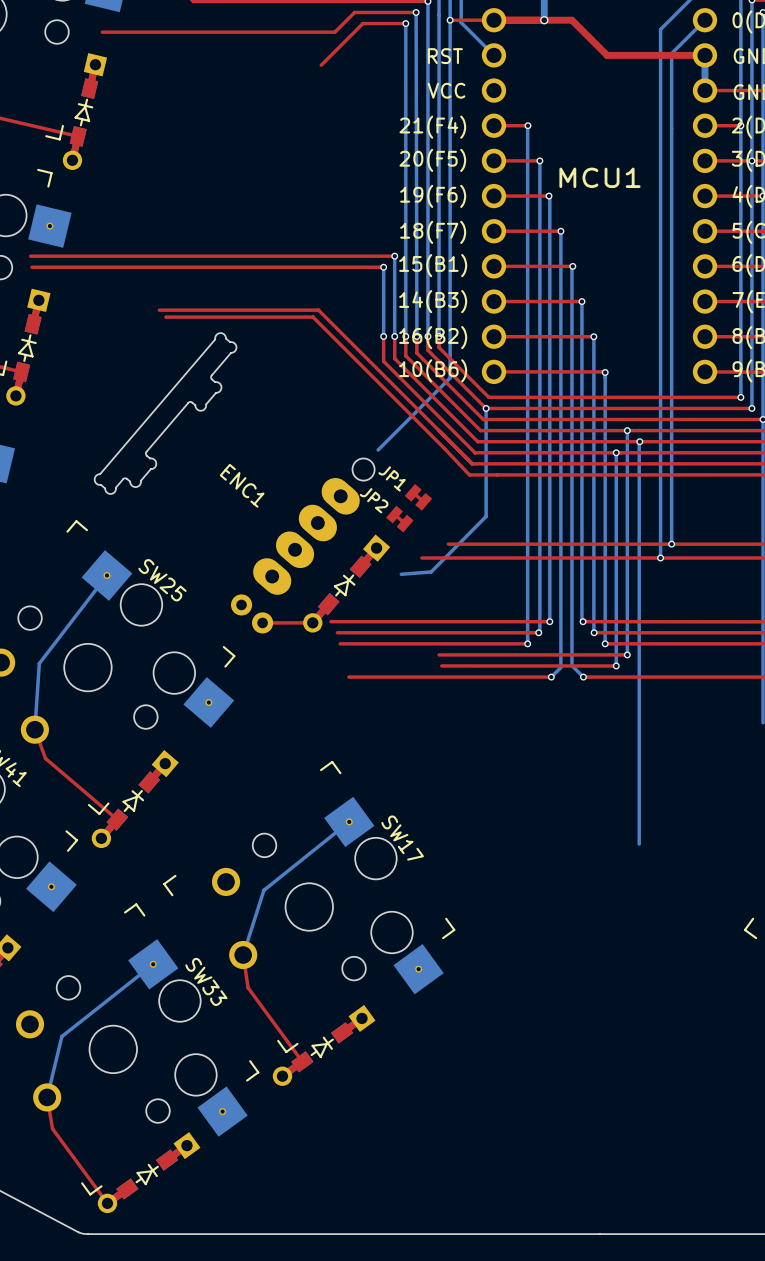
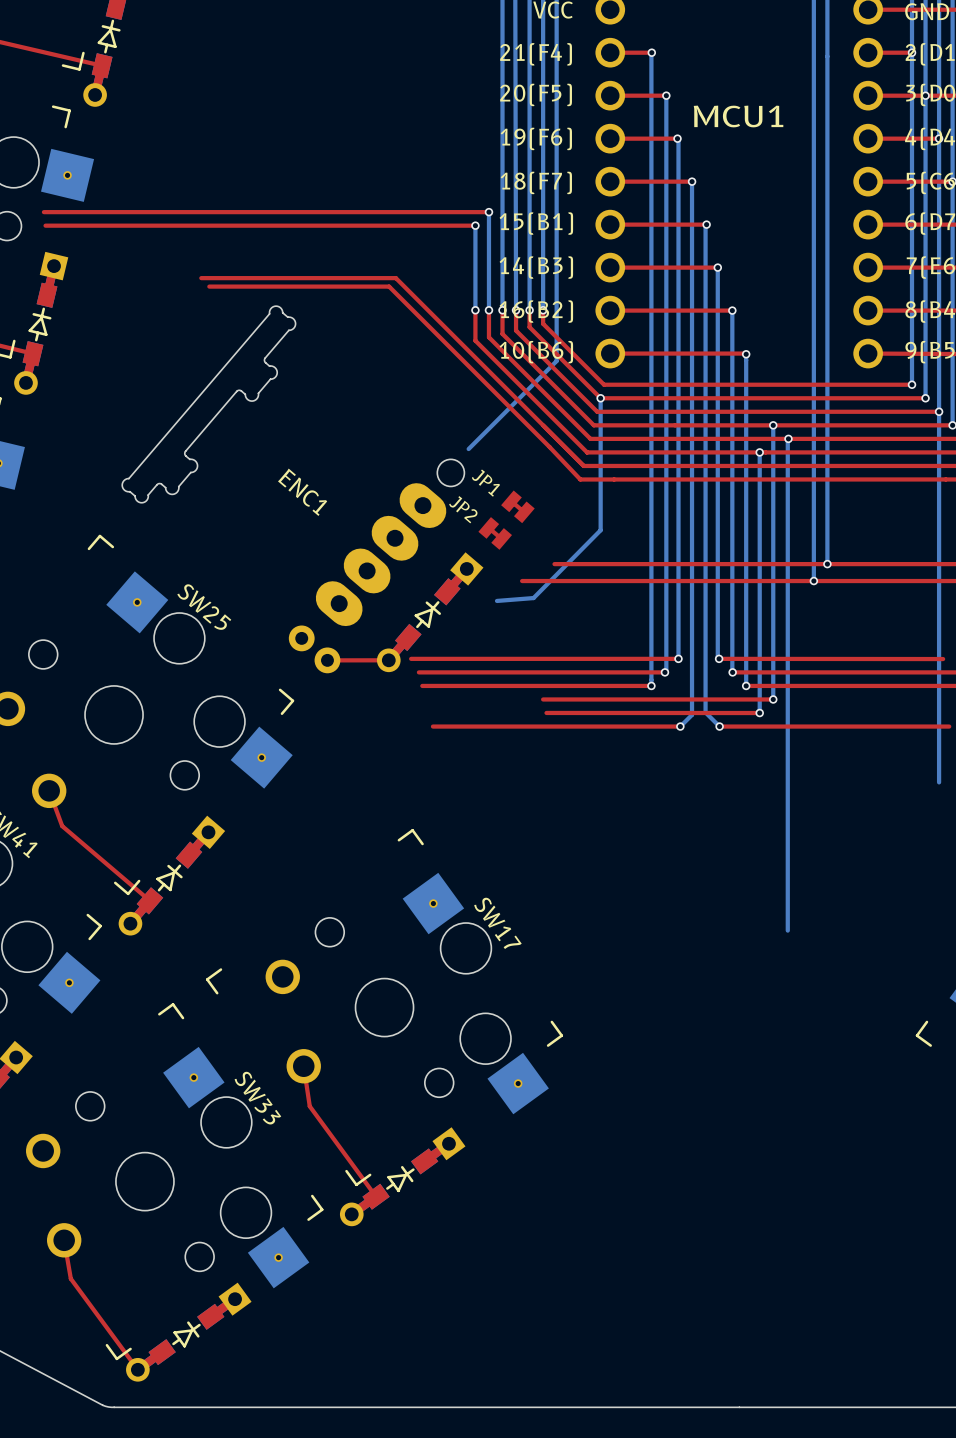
bottom track: (106, 575) (39, 663) (34, 729) -> none
bottom track: (349, 821) (263, 890) (243, 955) -> none
bottom track: (153, 964) (61, 1036) (47, 1097) -> none

